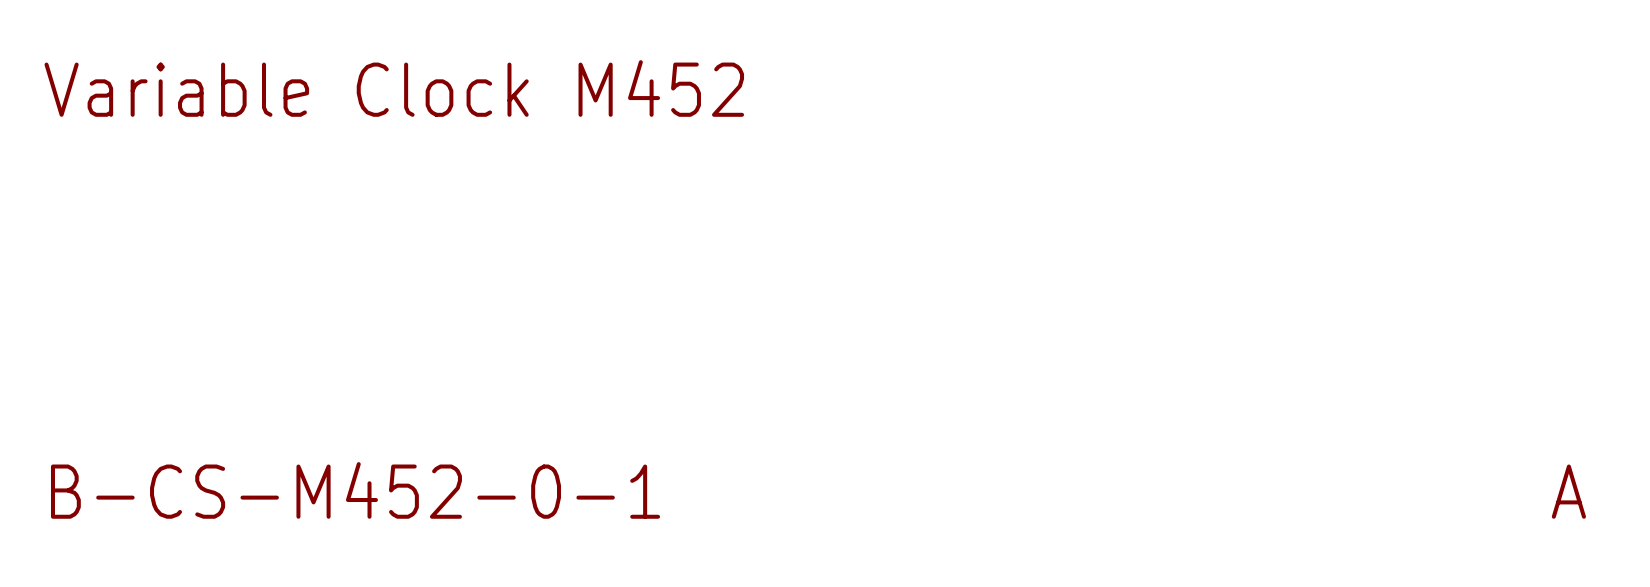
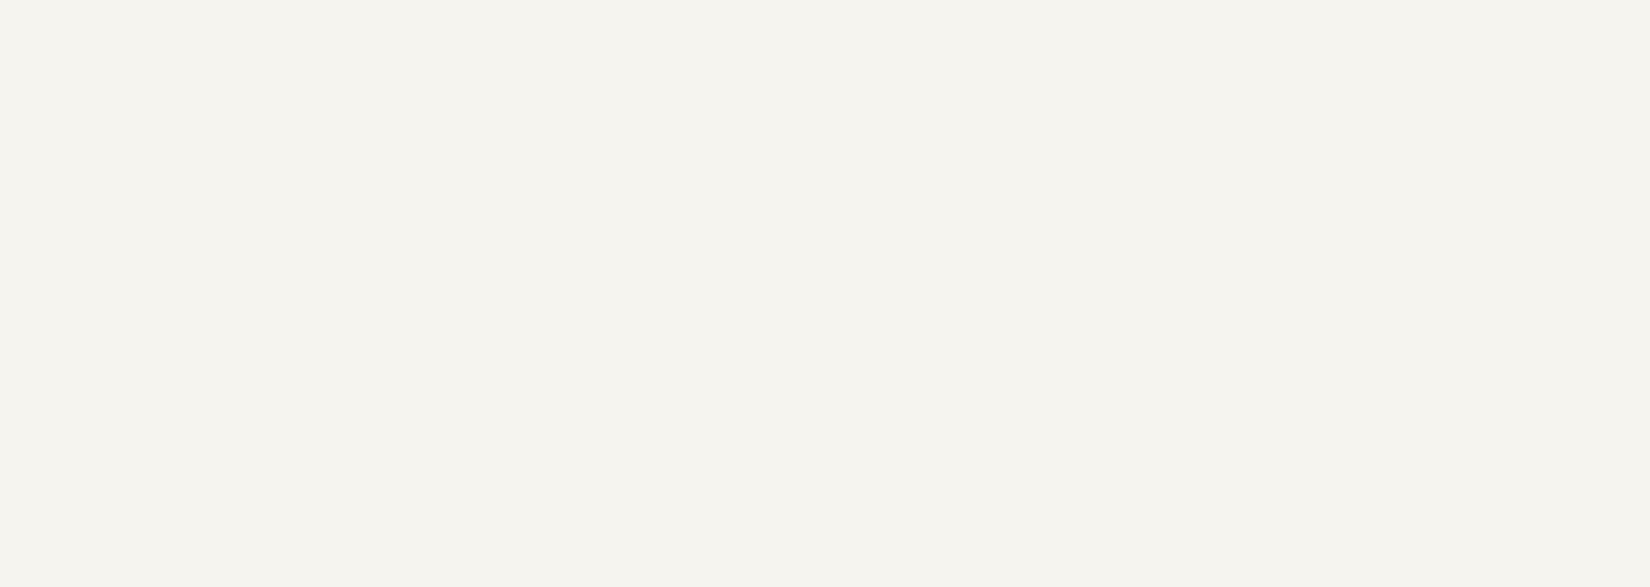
text: Variable Clock M452 (394, 88) -> none
text: B-CS-M452-0-1 (355, 490) -> none
text: A (1568, 491) -> none

